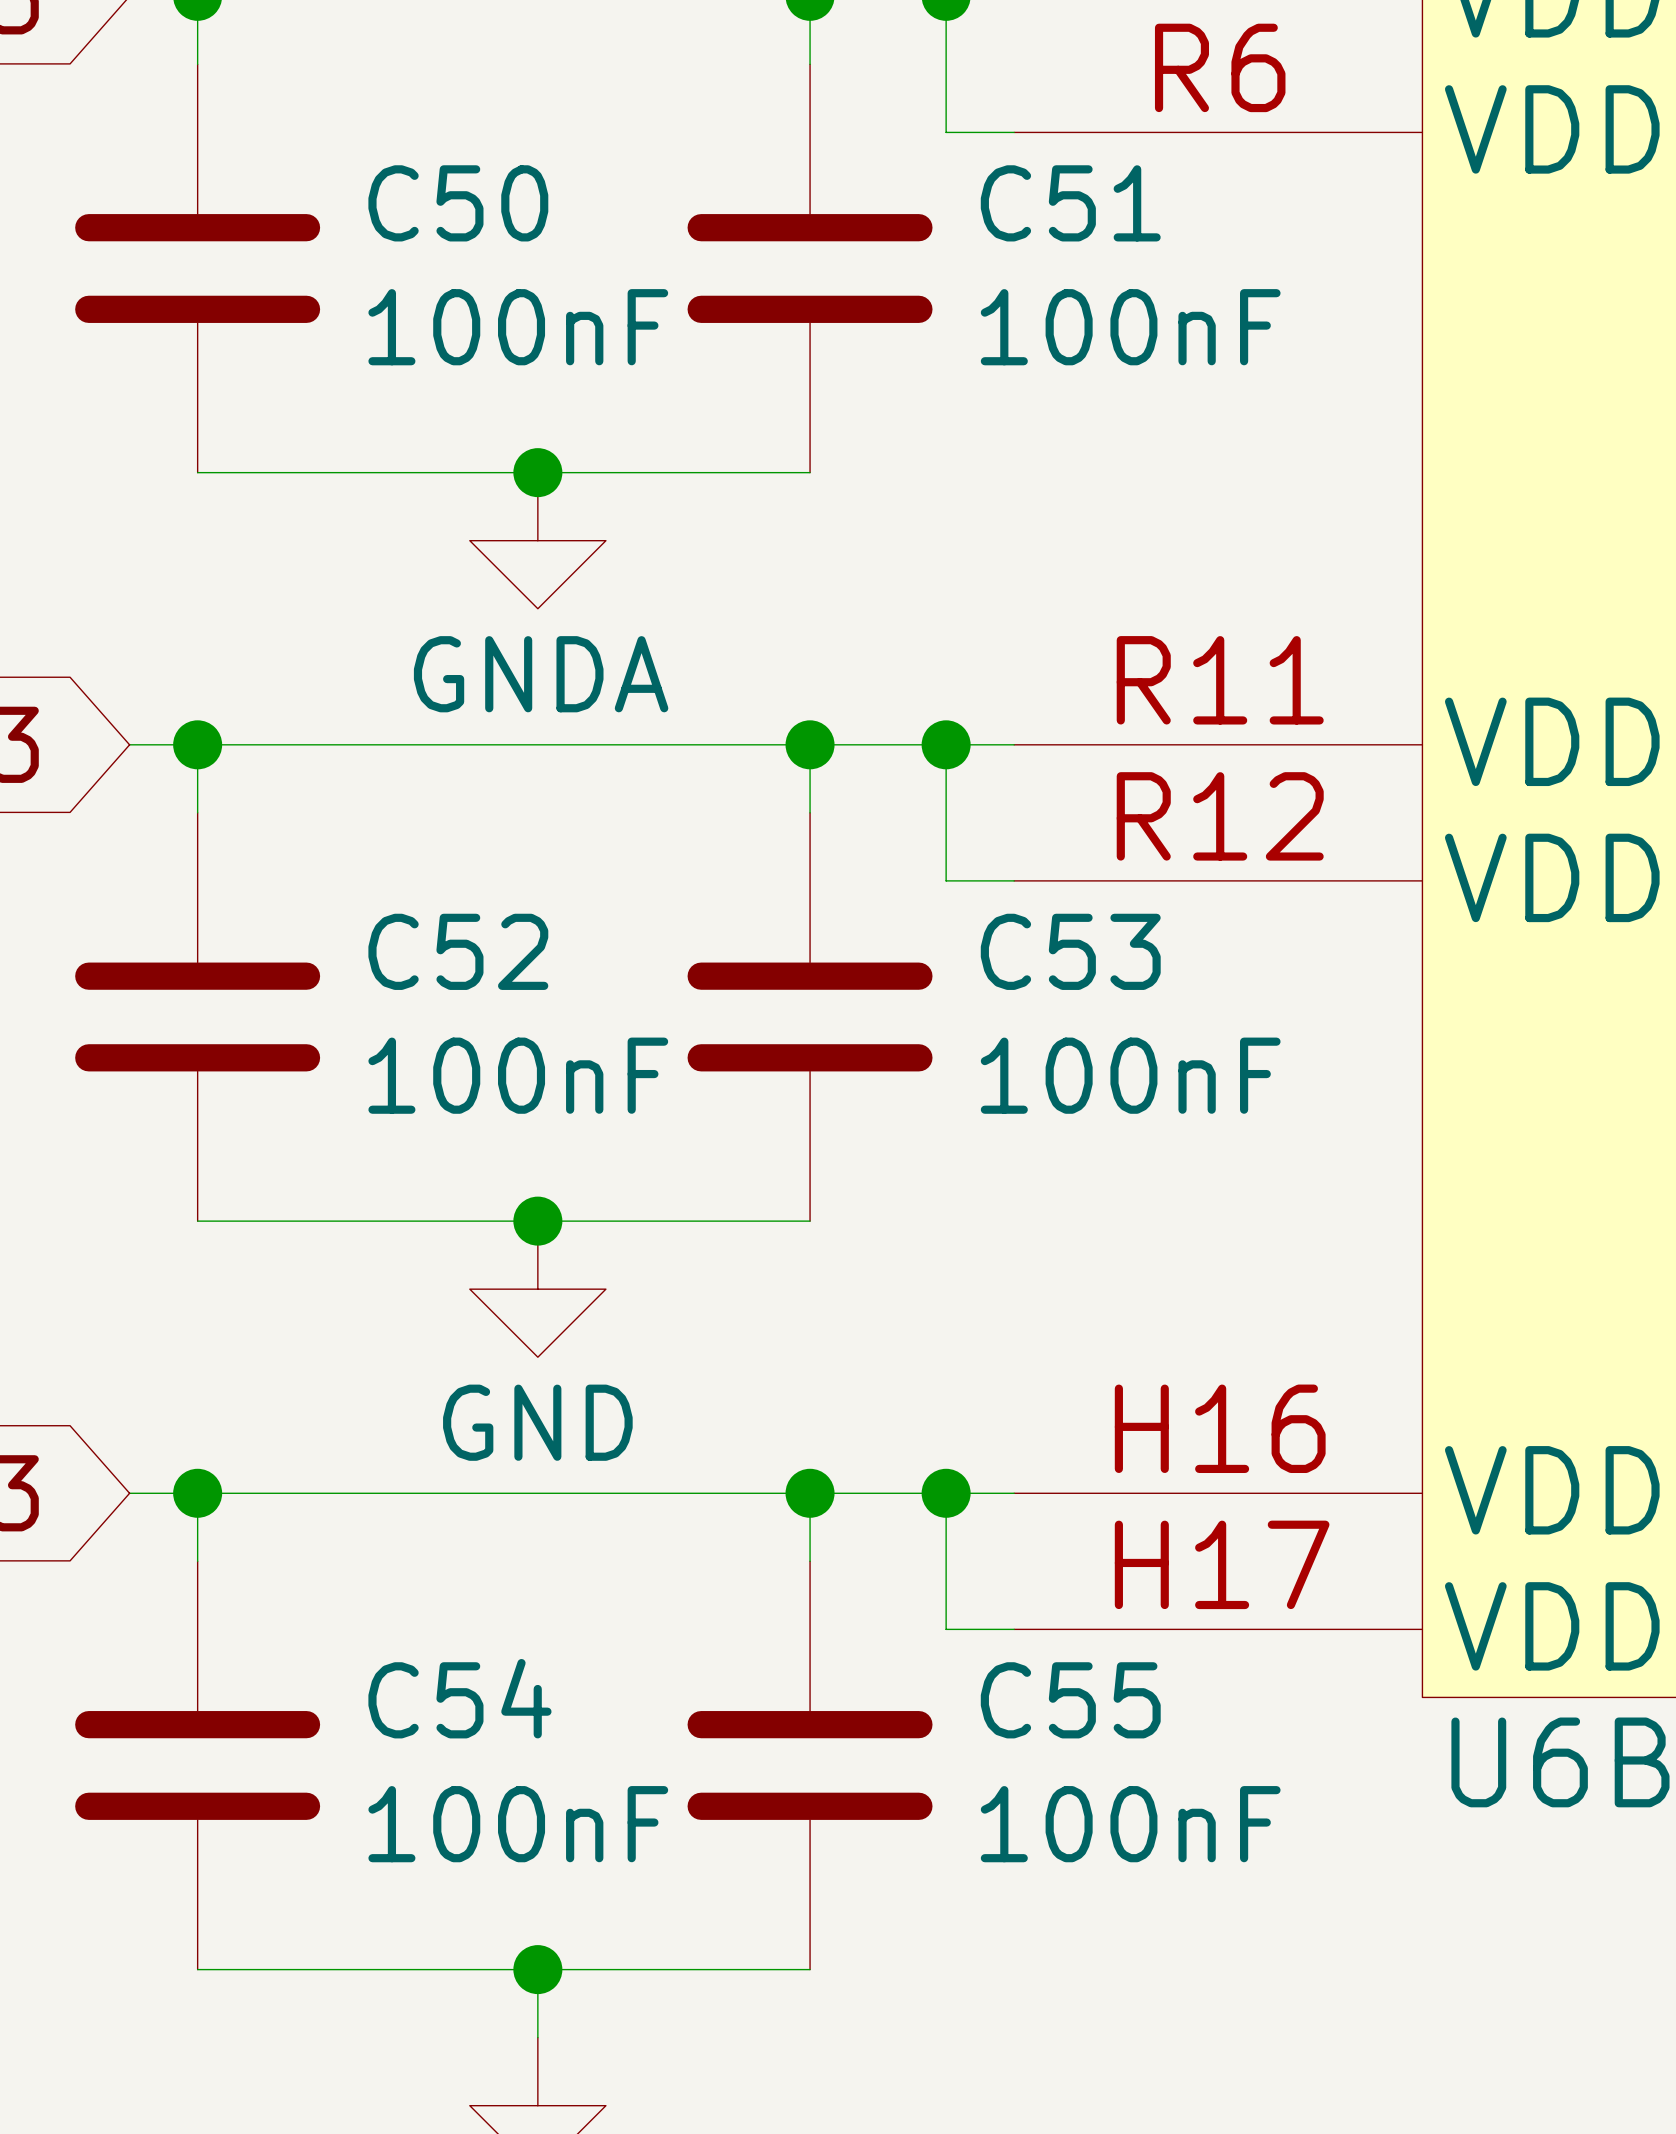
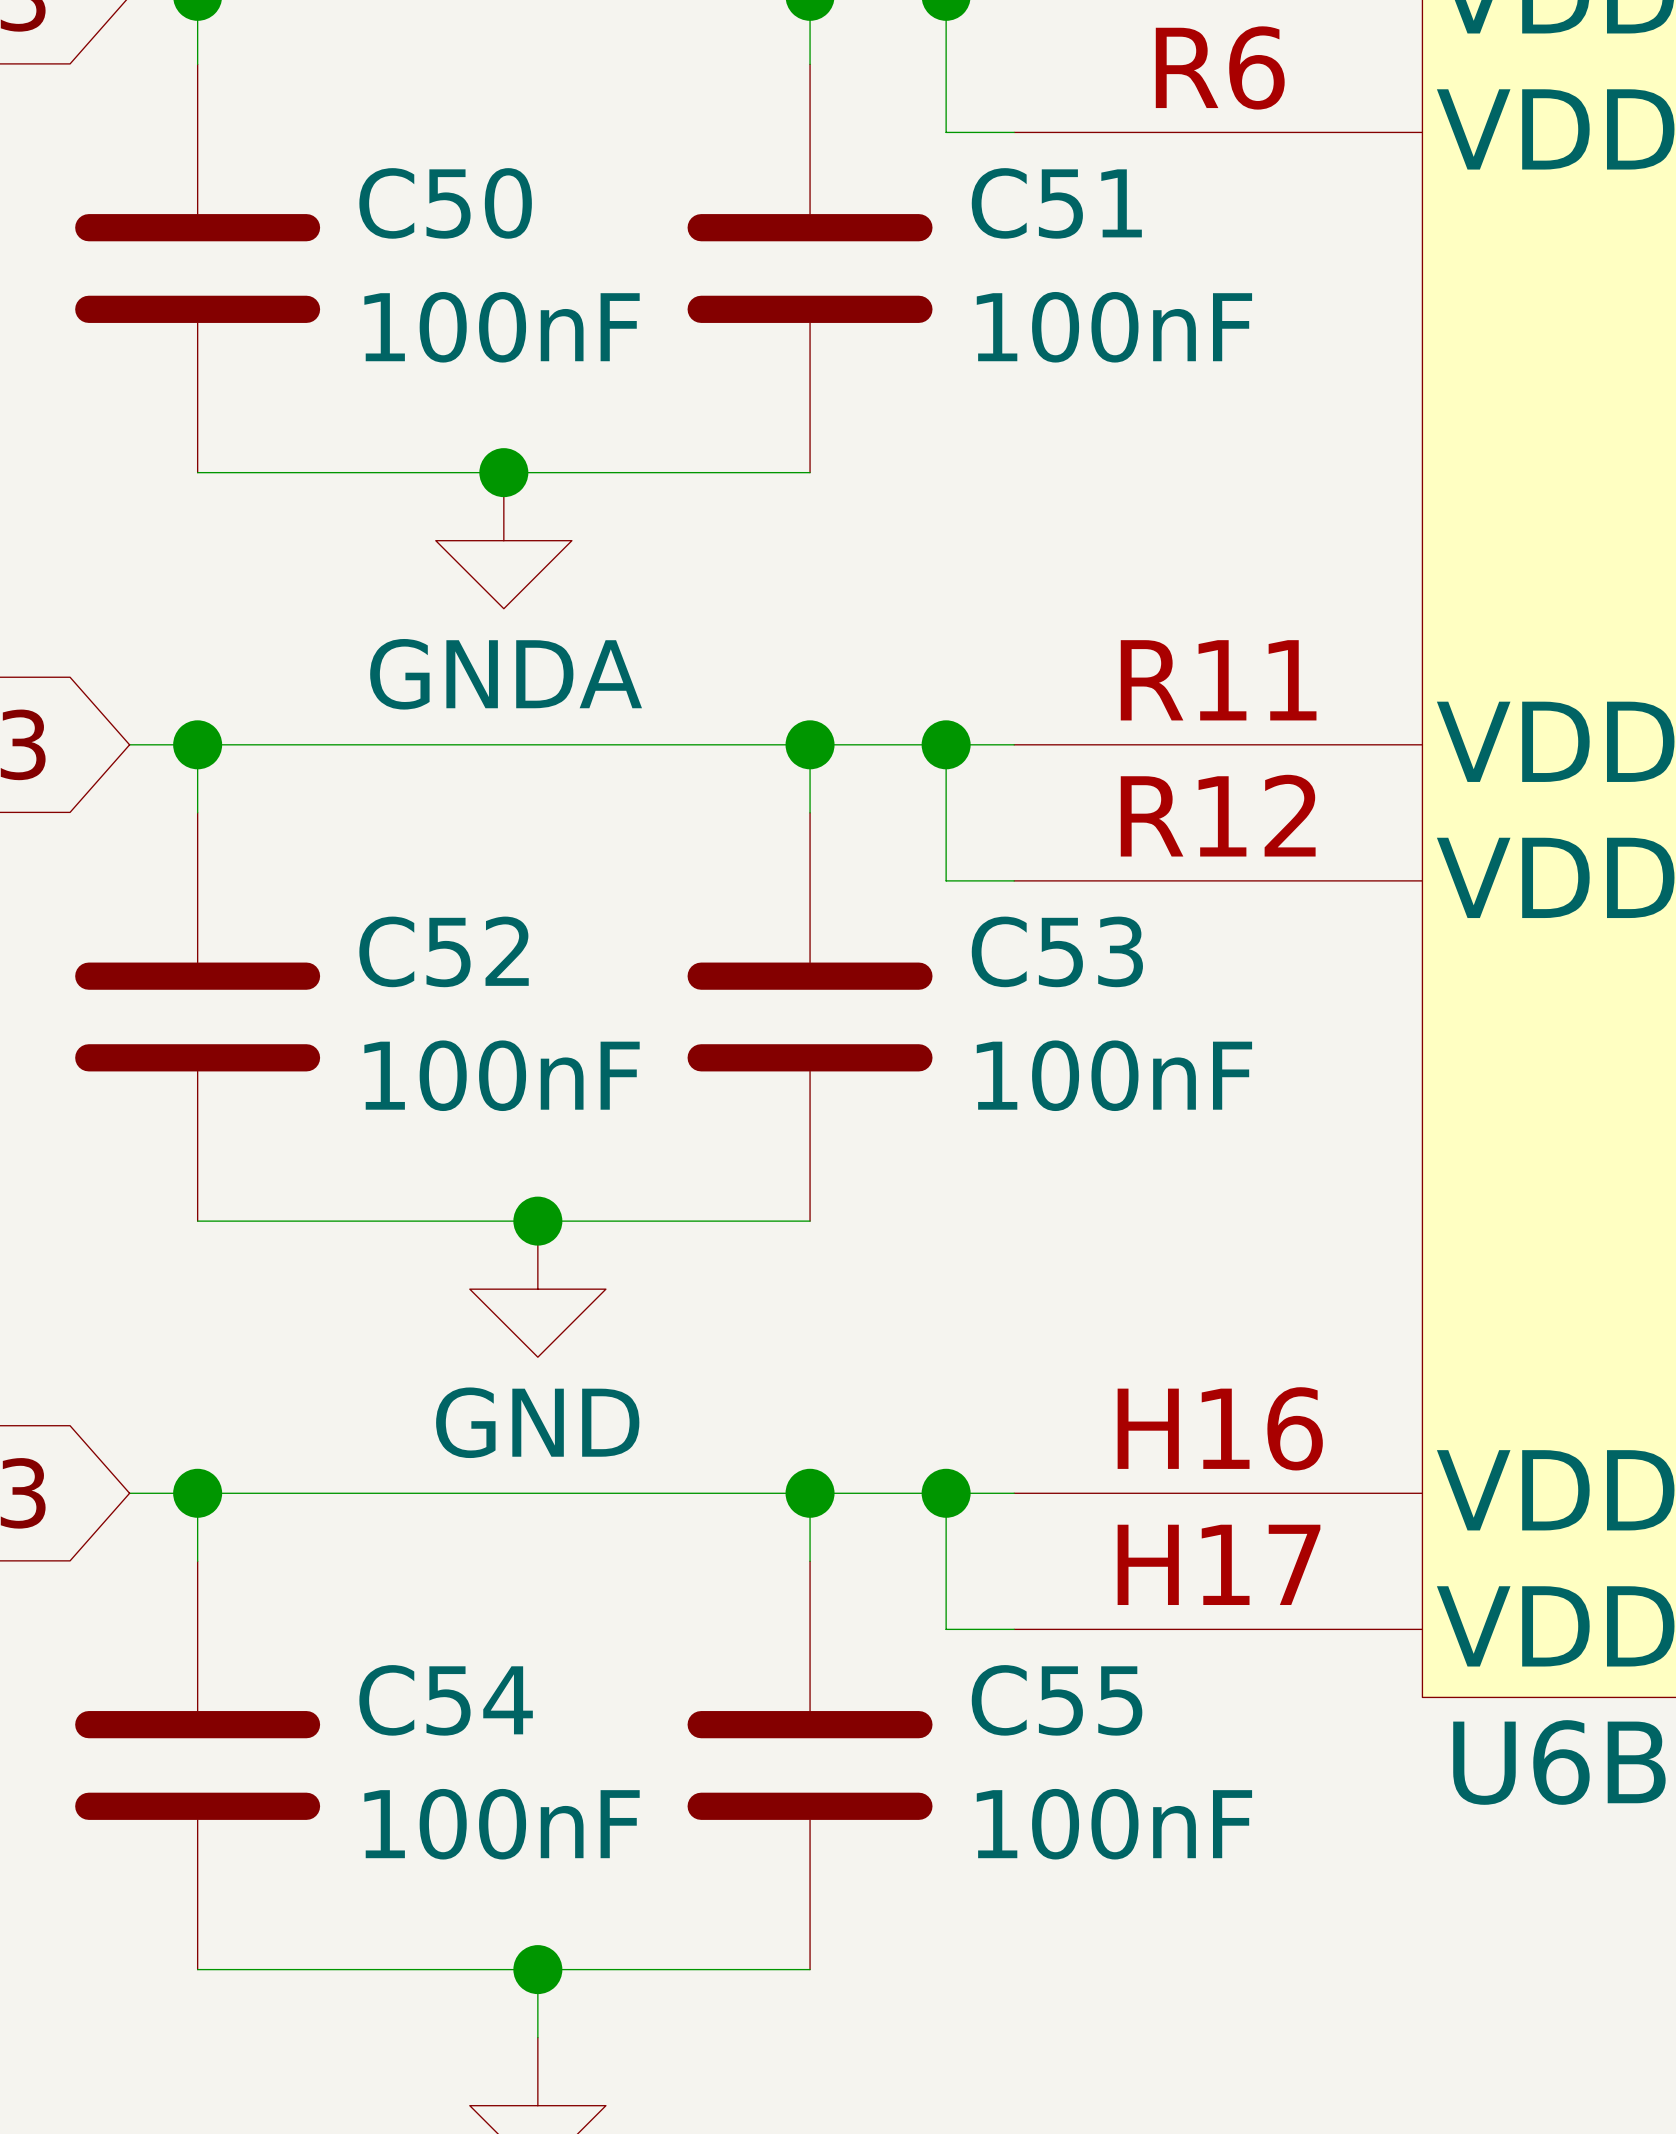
junction position: (537, 472) -> (503, 472)
power symbol position: GNDA (537, 540) -> GNDA (503, 540)

